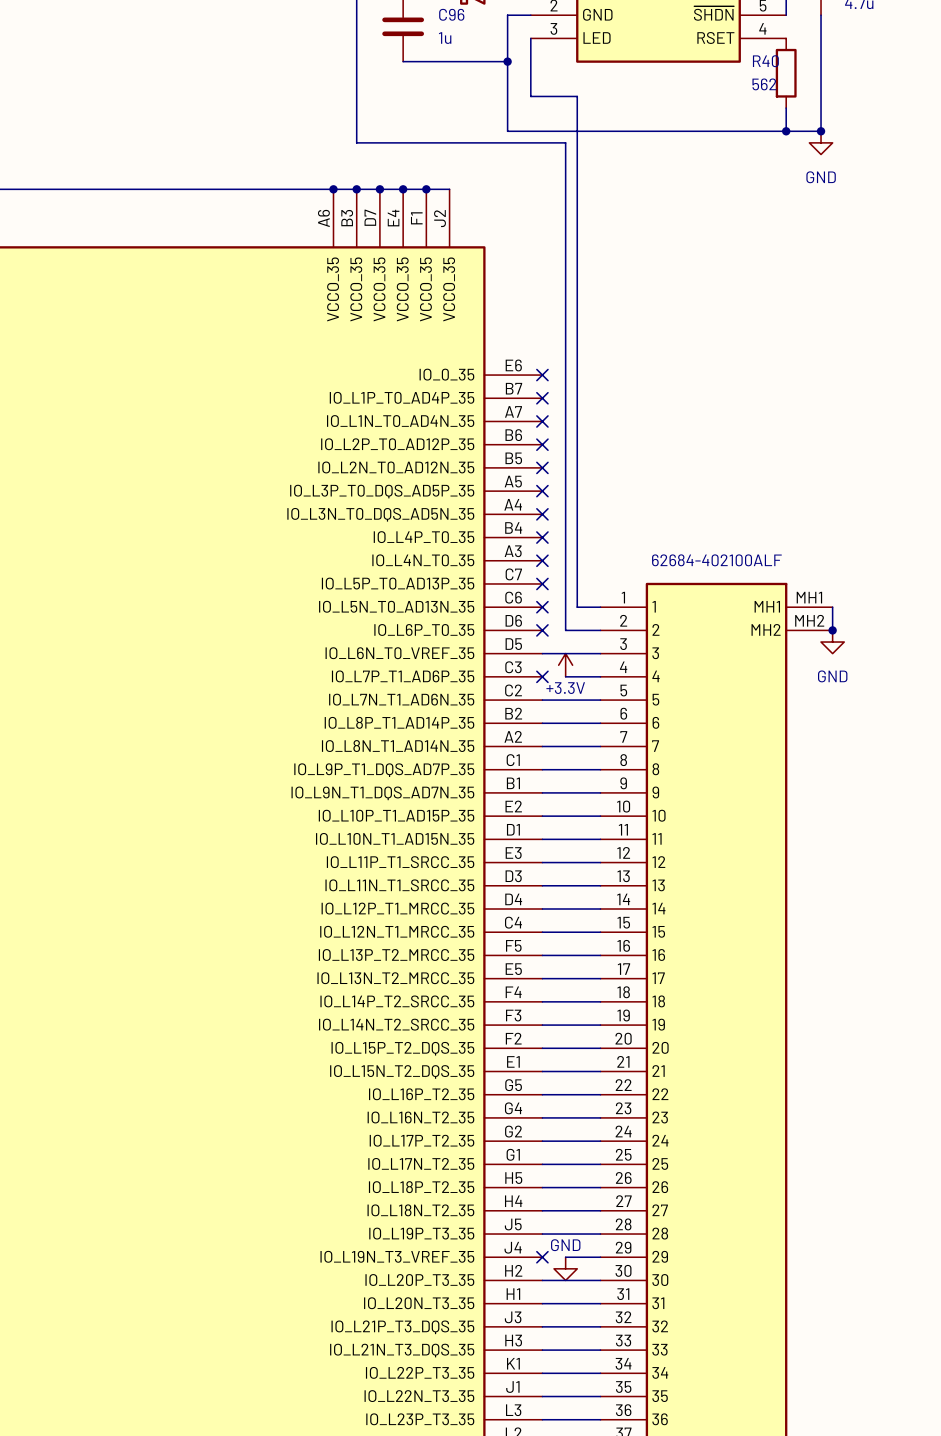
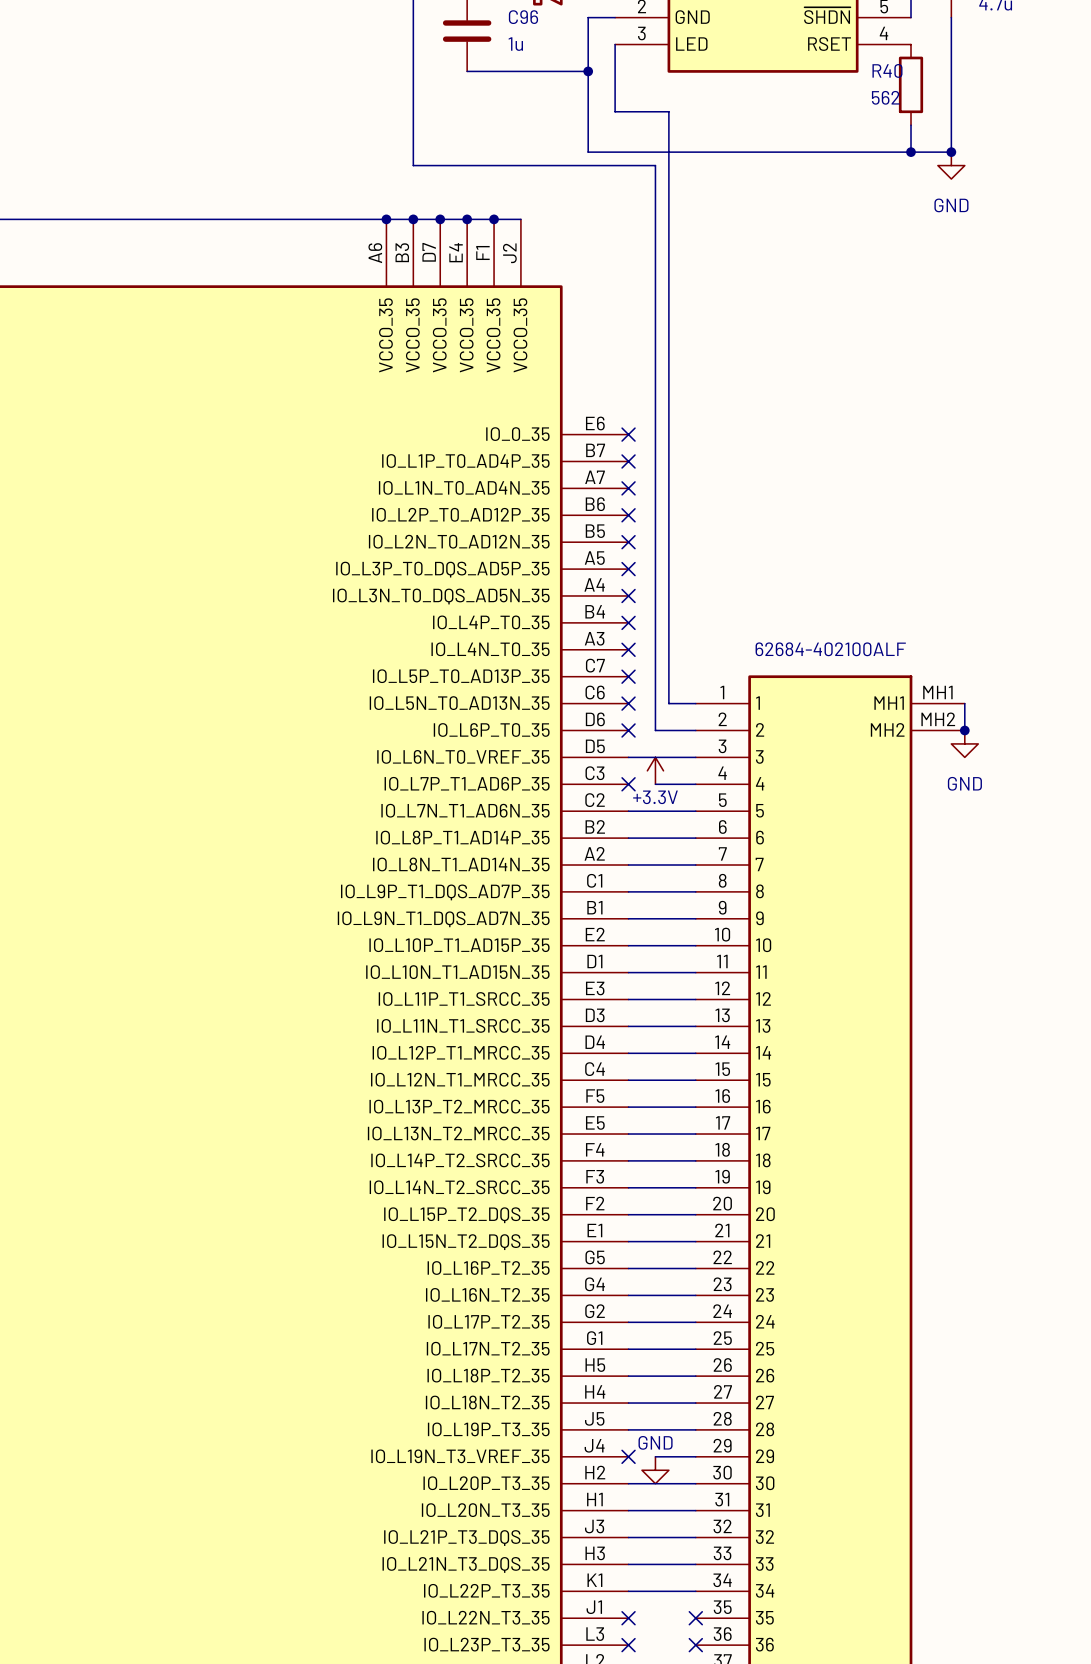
wire: (542, 1396) (600, 1396) -> none
no-connect mark: none -> (628, 1618)
no-connect mark: none -> (695, 1618)
wire: (542, 1419) (600, 1419) -> none
no-connect mark: none -> (628, 1645)
no-connect mark: none -> (695, 1645)

